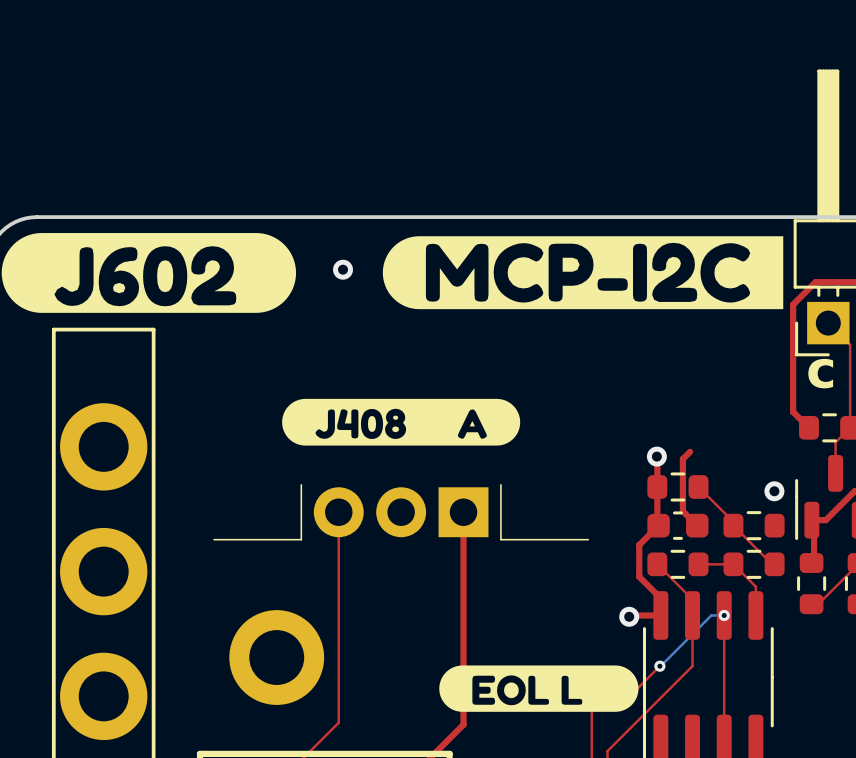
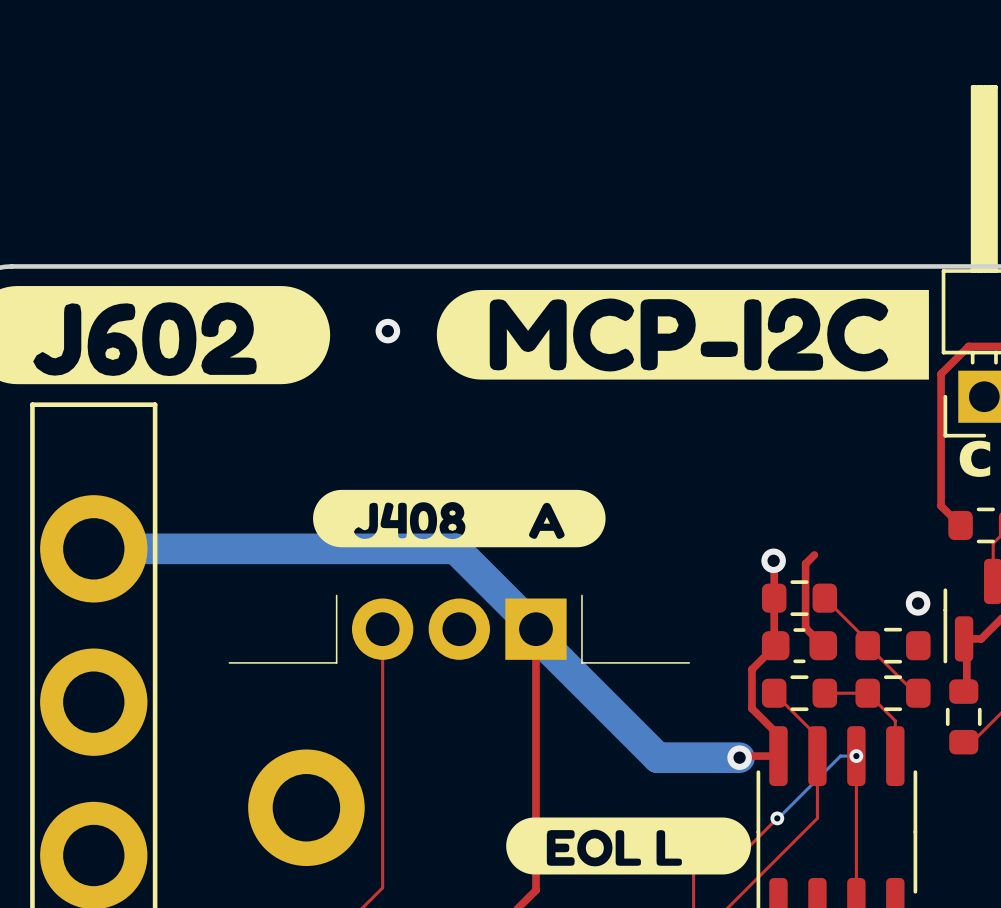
bottom track: none -> (93, 548) (455, 548) (535, 629) (535, 635) (657, 757) (739, 757)

